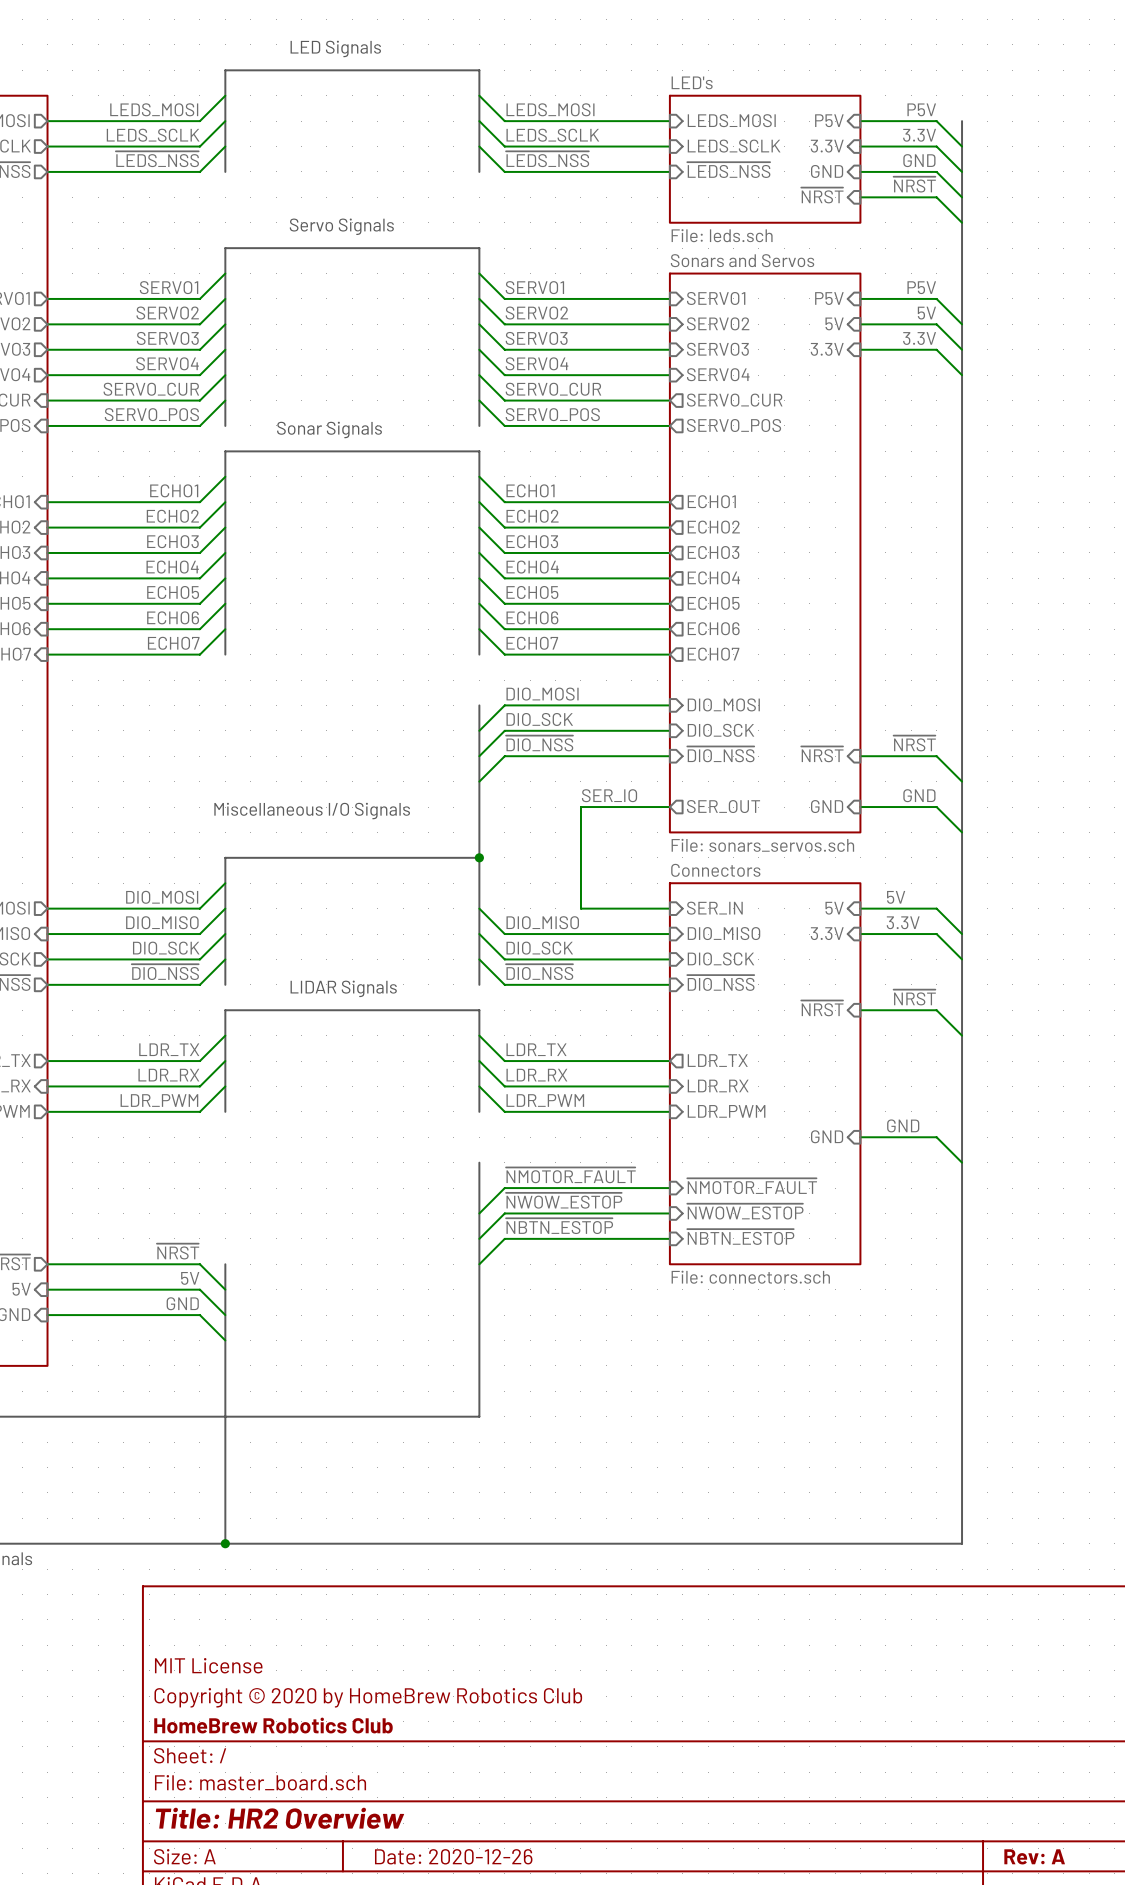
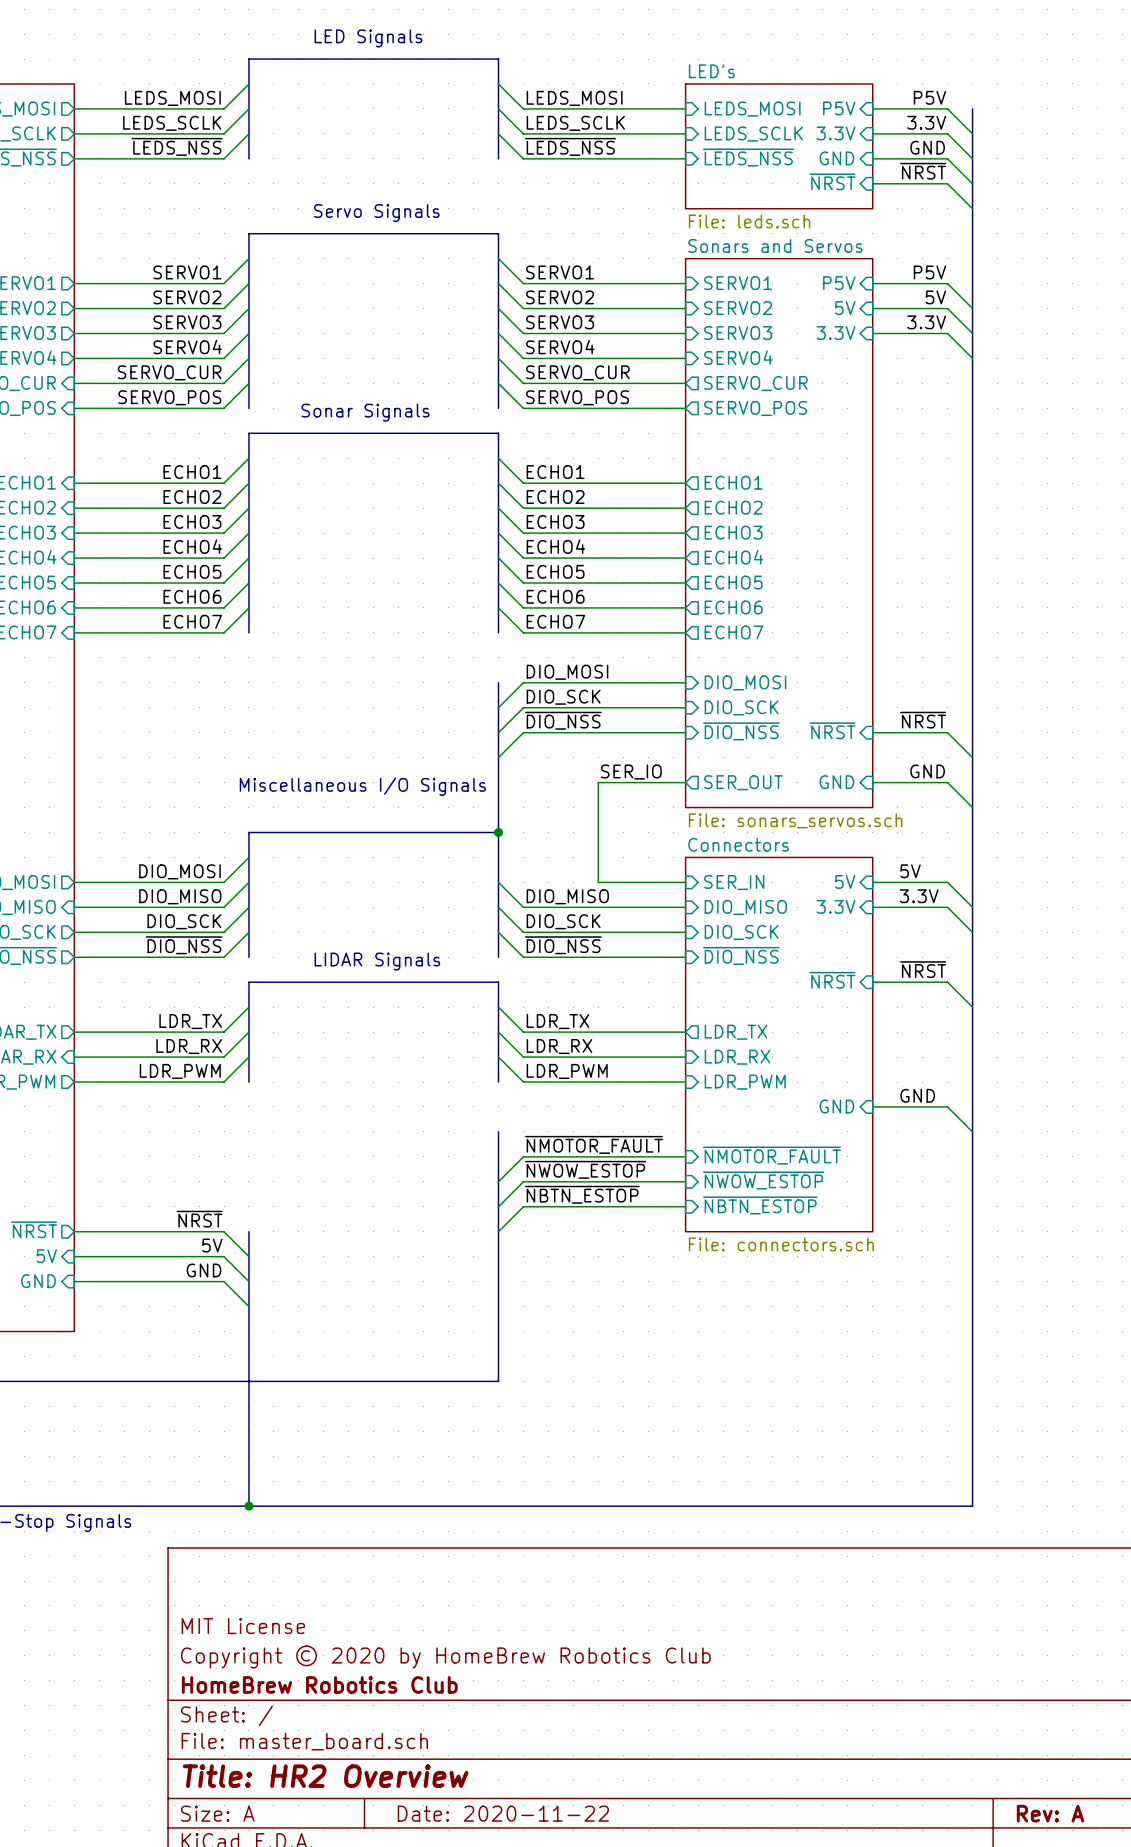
title block: Date: 2020-12-26 (453, 1856) -> Date: 2020-11-22 (503, 1813)

